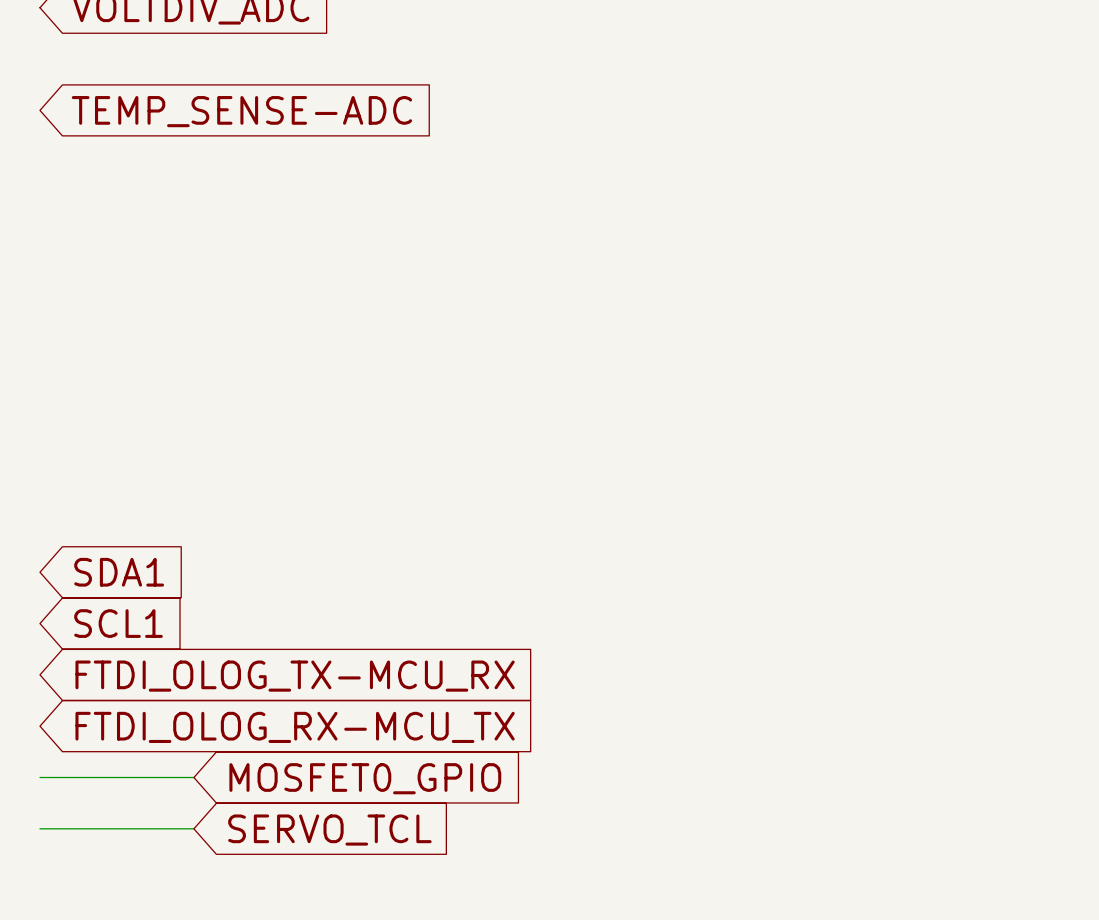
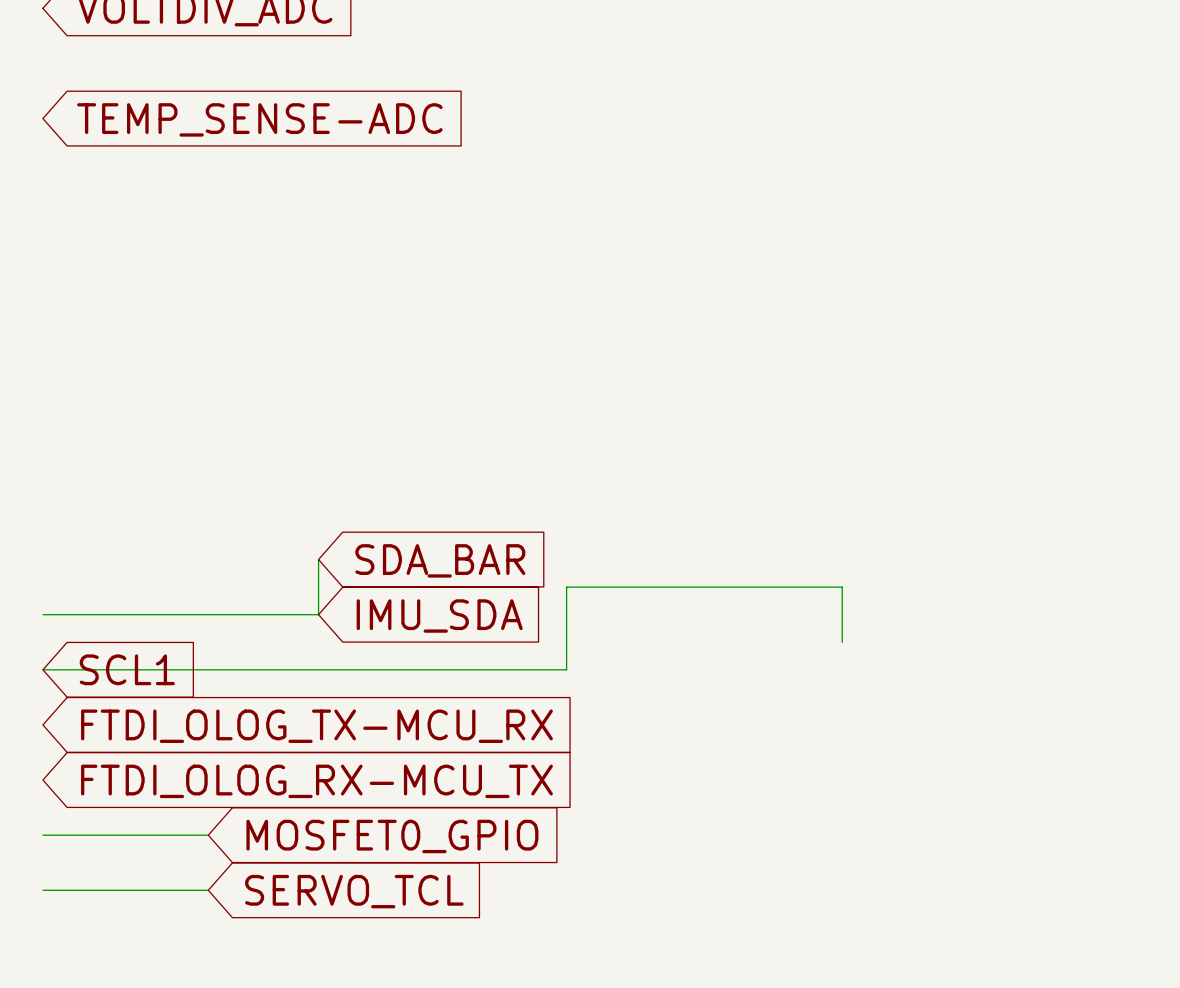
wire: none -> (318, 559) (318, 614) (42, 614)
global label: none -> SDA_BAR (440, 560)
global label: SDA1 (119, 572) -> none
global label: none -> IMU_SDA (439, 615)
wire: none -> (842, 642) (842, 587) (566, 587) (566, 669) (42, 669)

